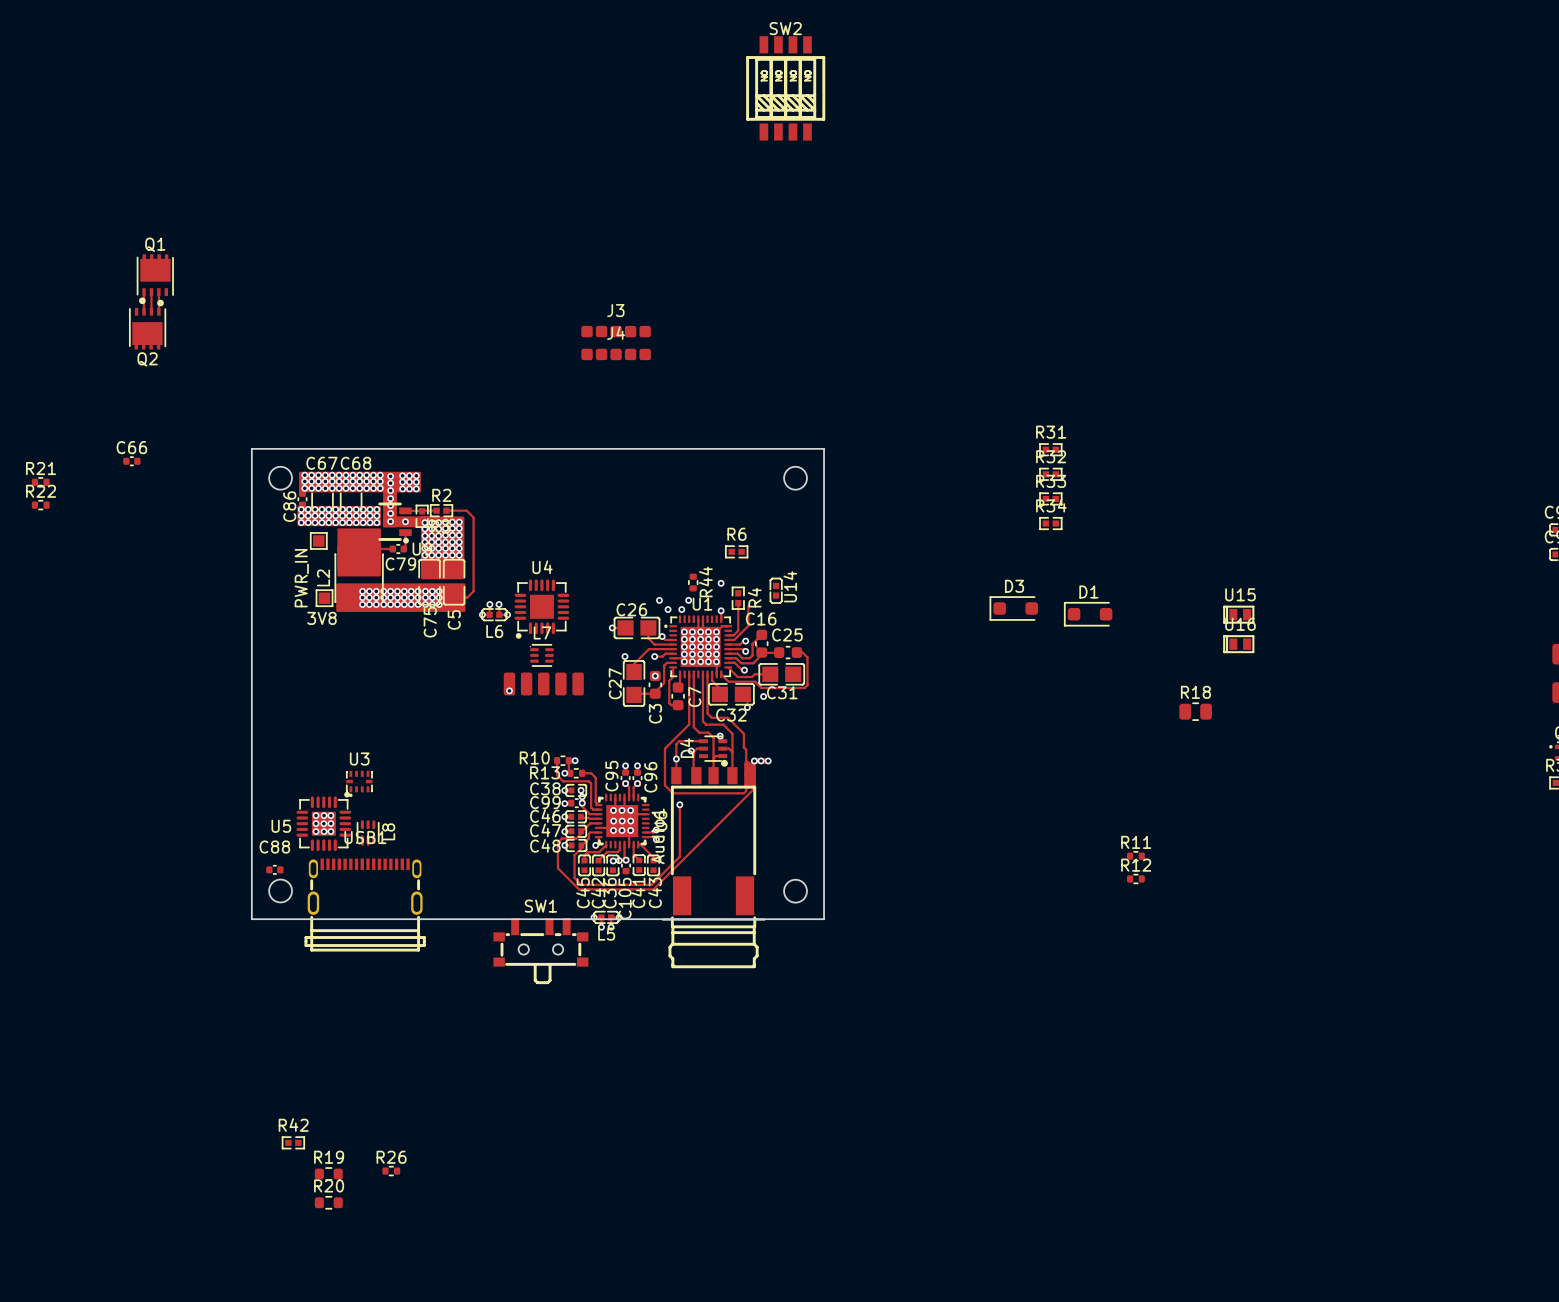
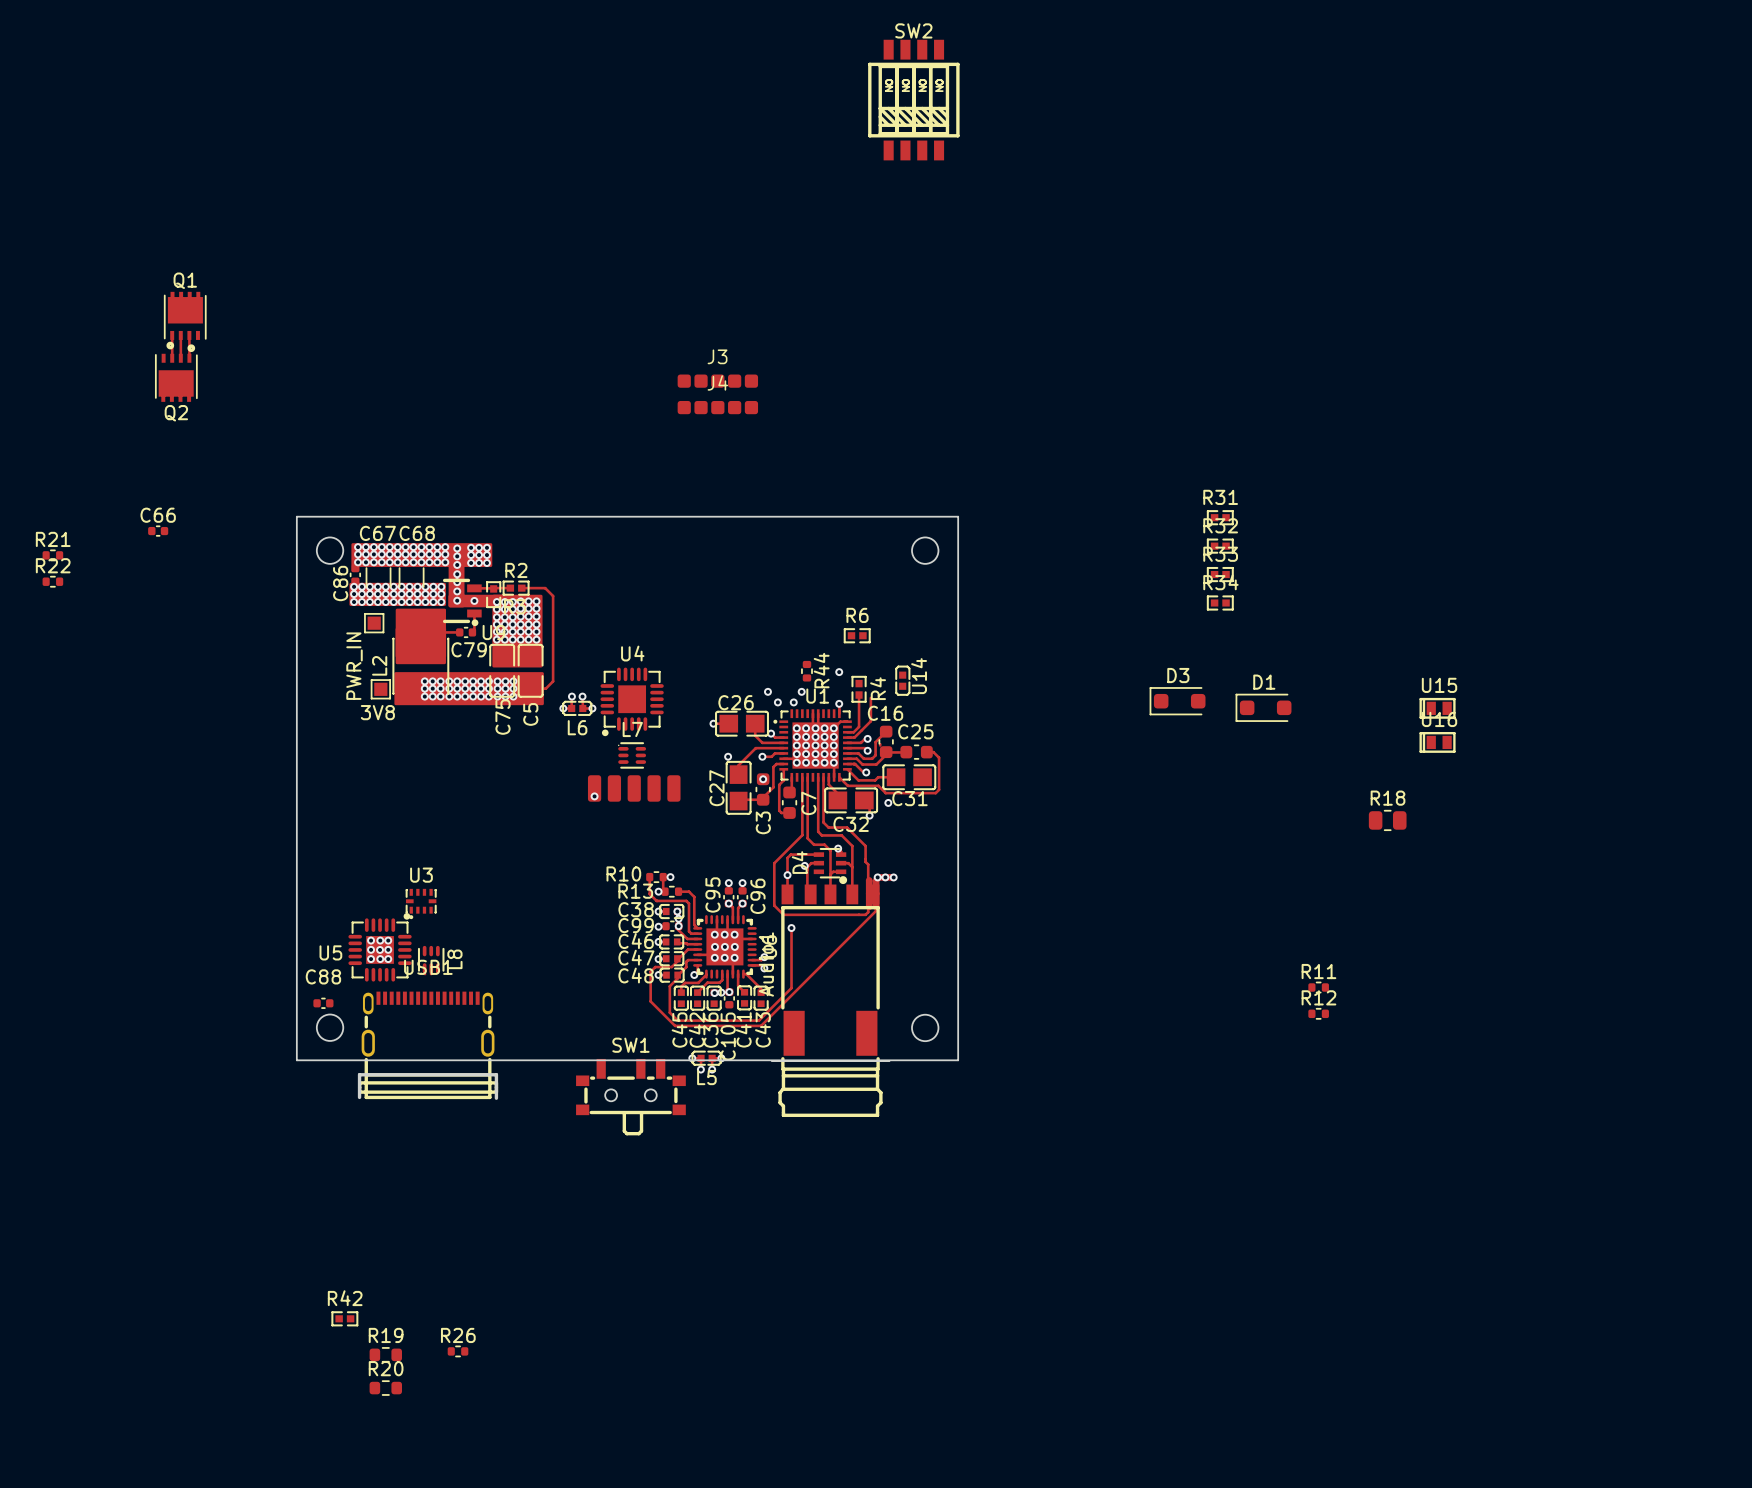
USB1 footprint: [304, 858, 426, 952] -> [357, 991, 499, 1100]

